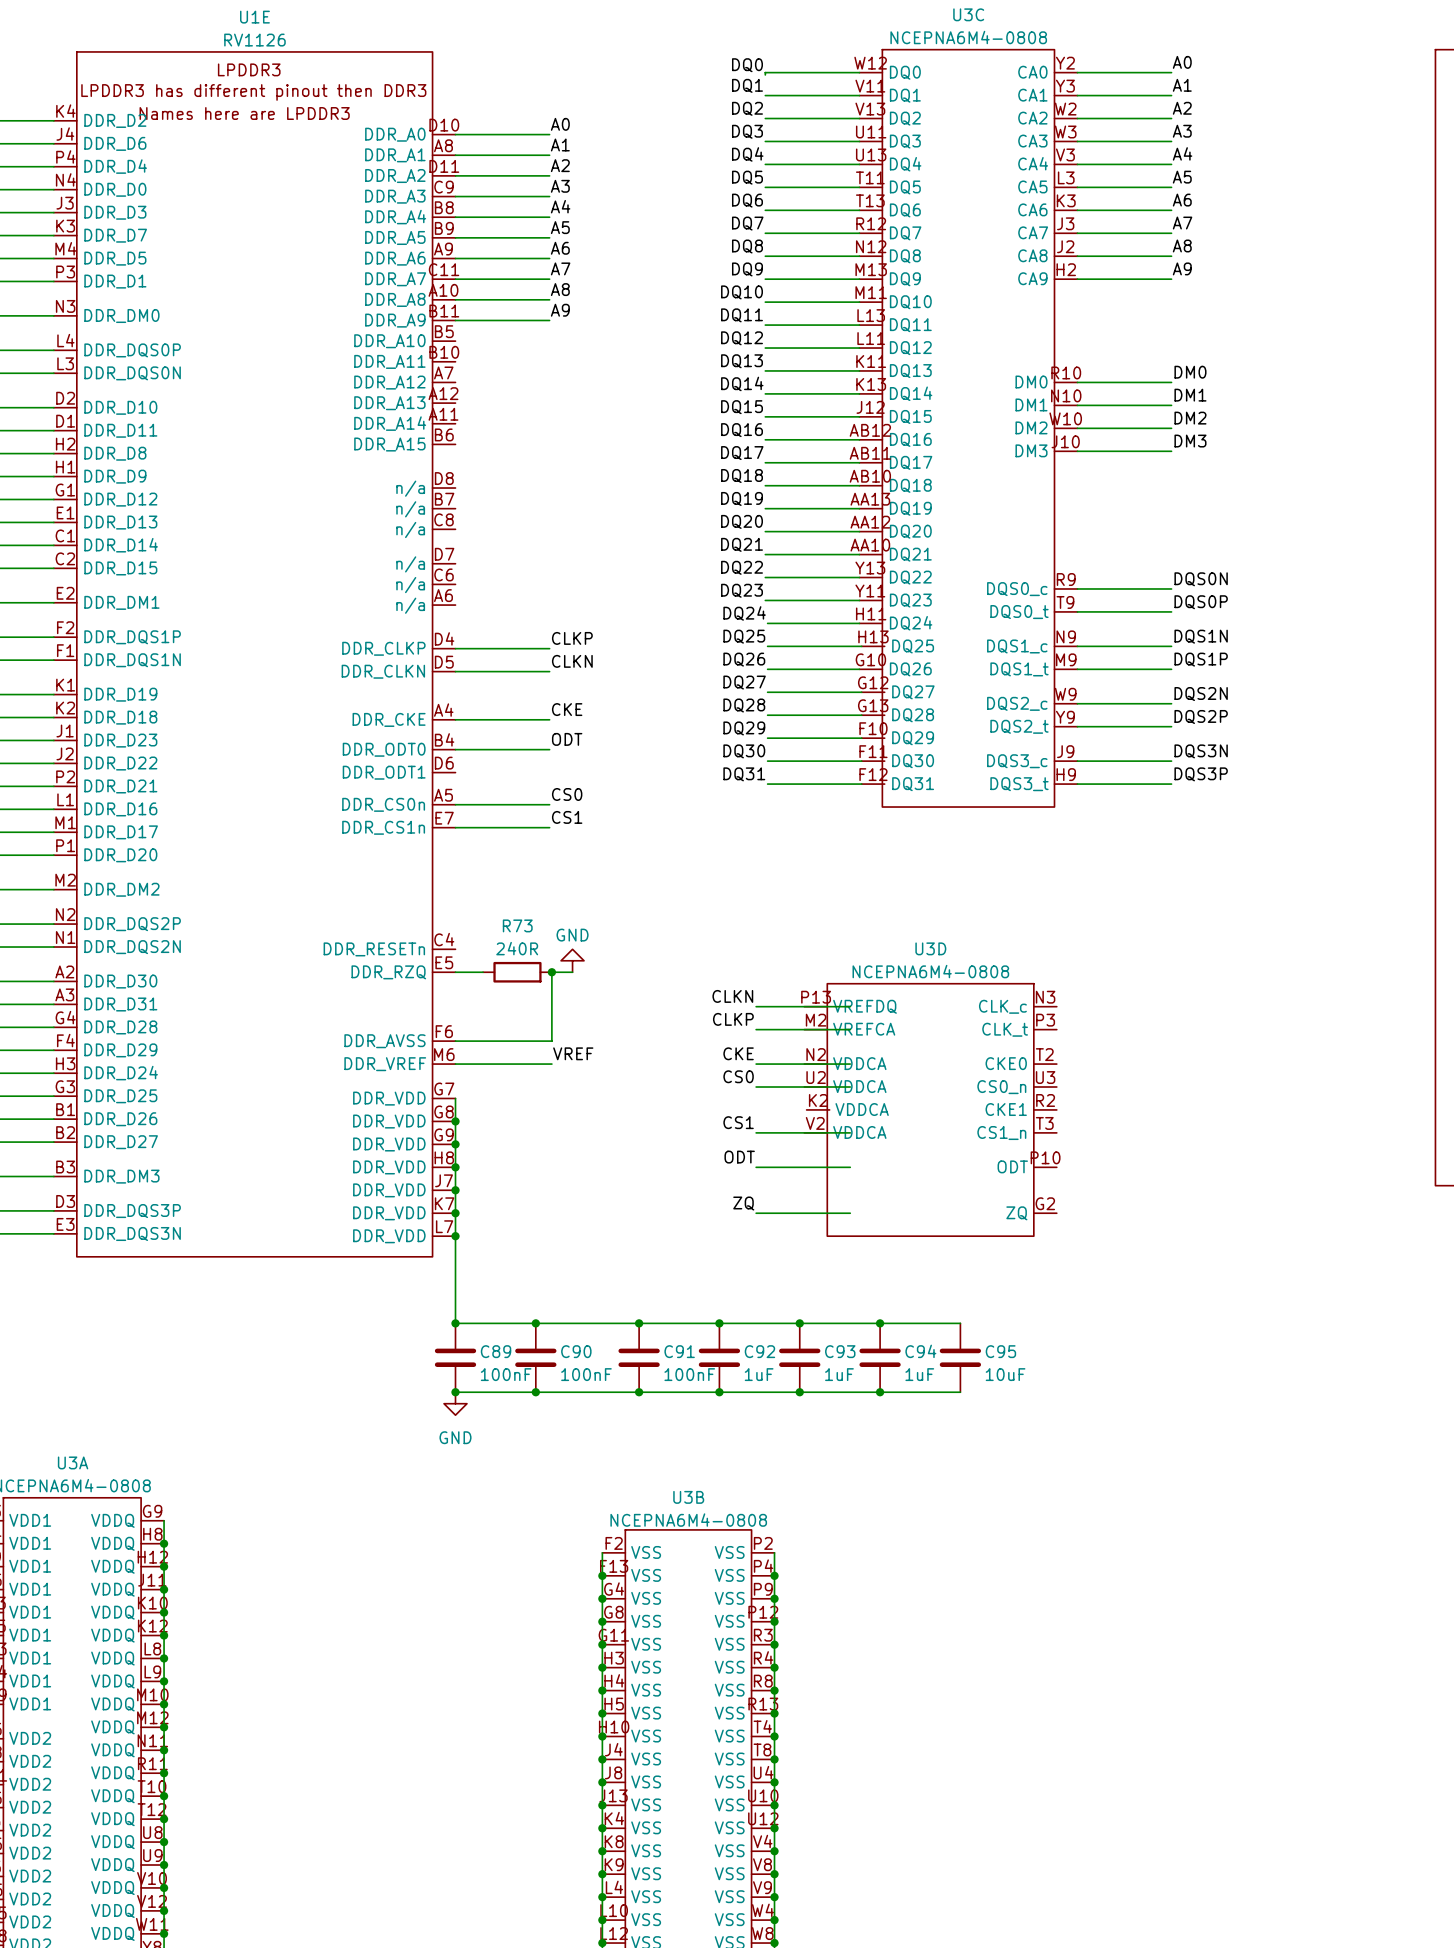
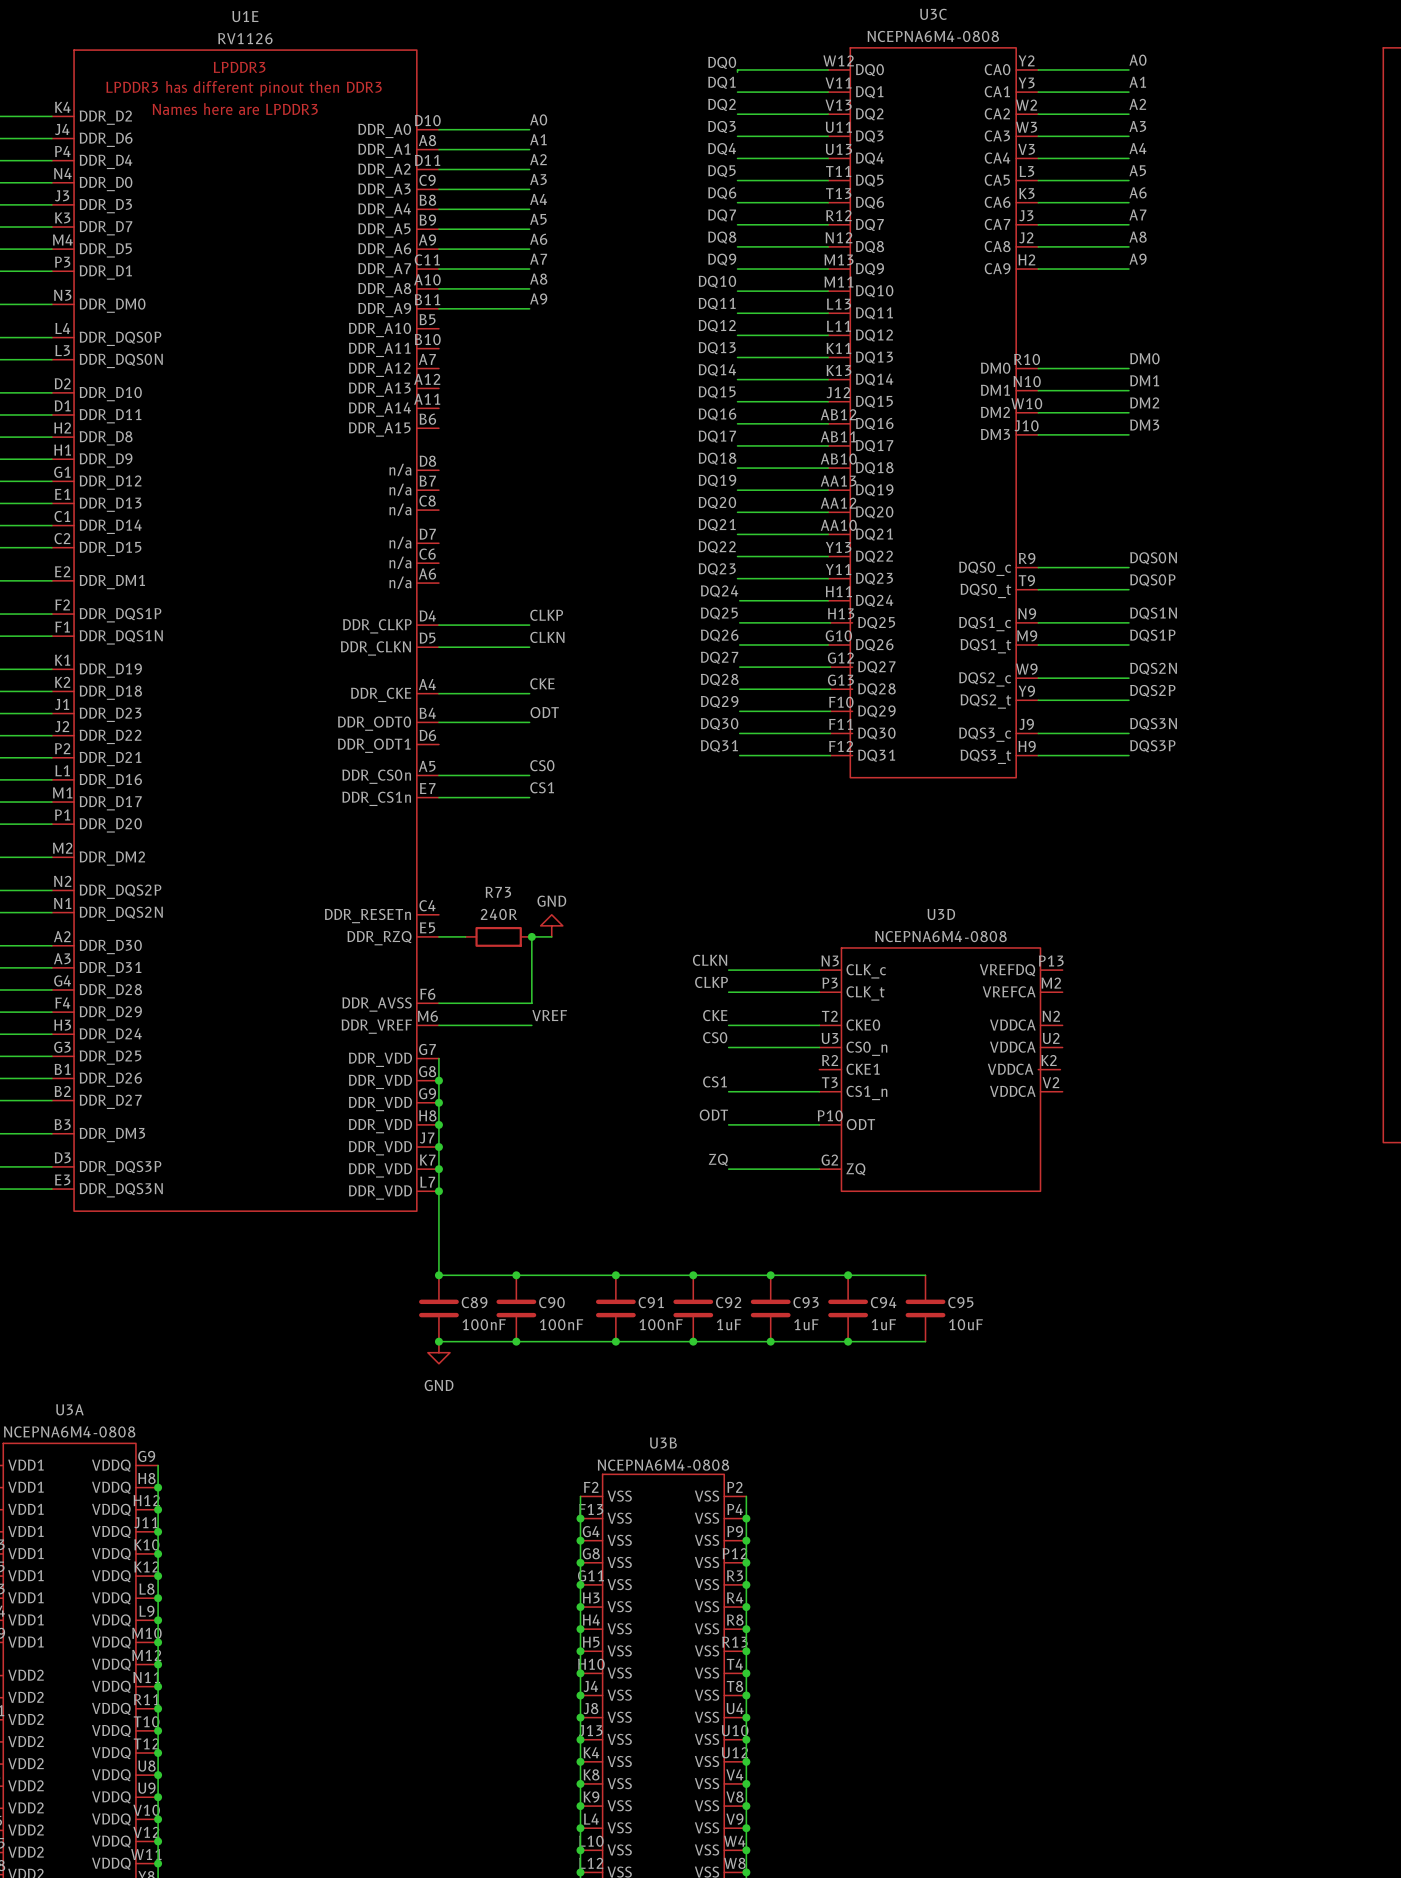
U3D flip: as is (930, 1109) -> left-right (940, 1069)

